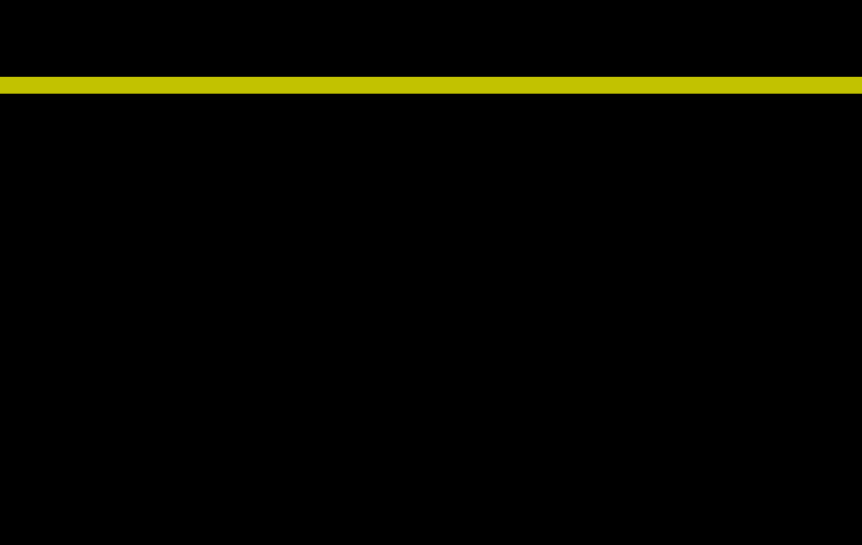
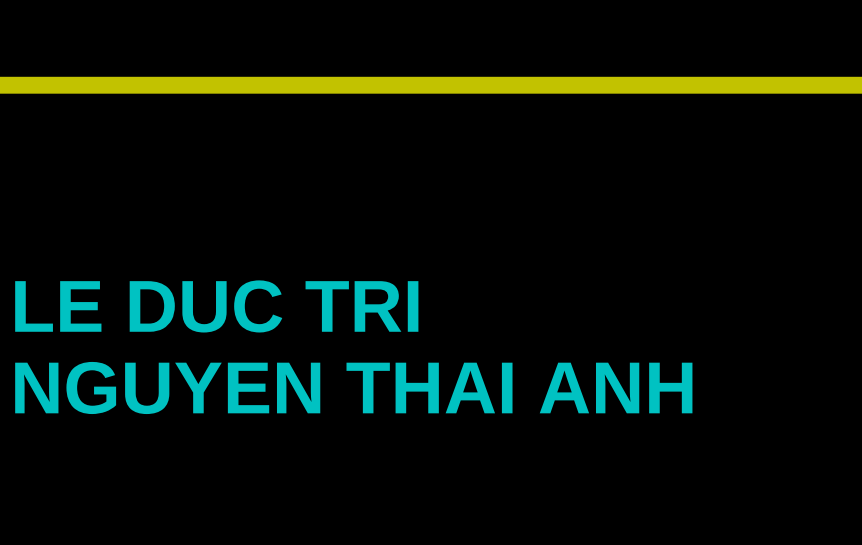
text: none -> LE DUC TRI (216, 306)
text: none -> NGUYEN THAI ANH (353, 387)

